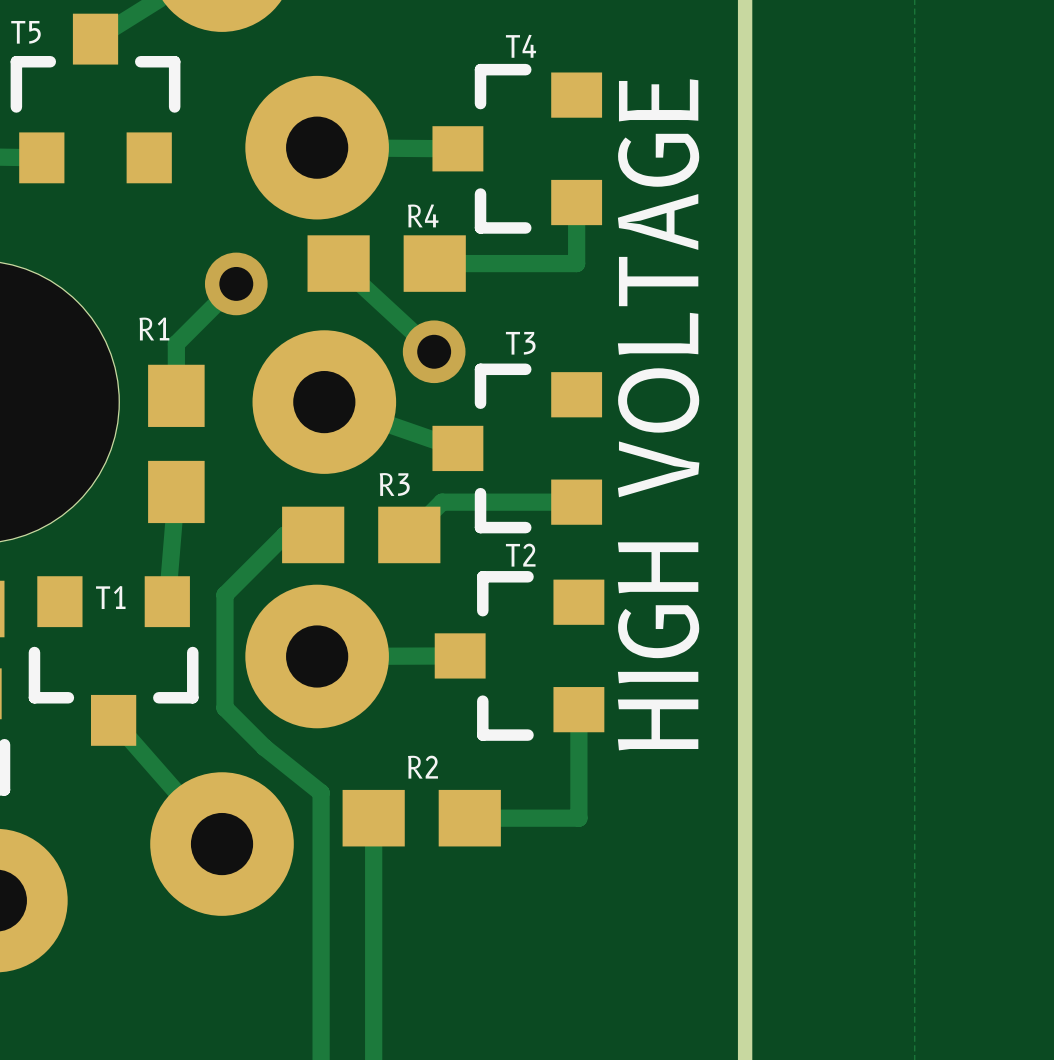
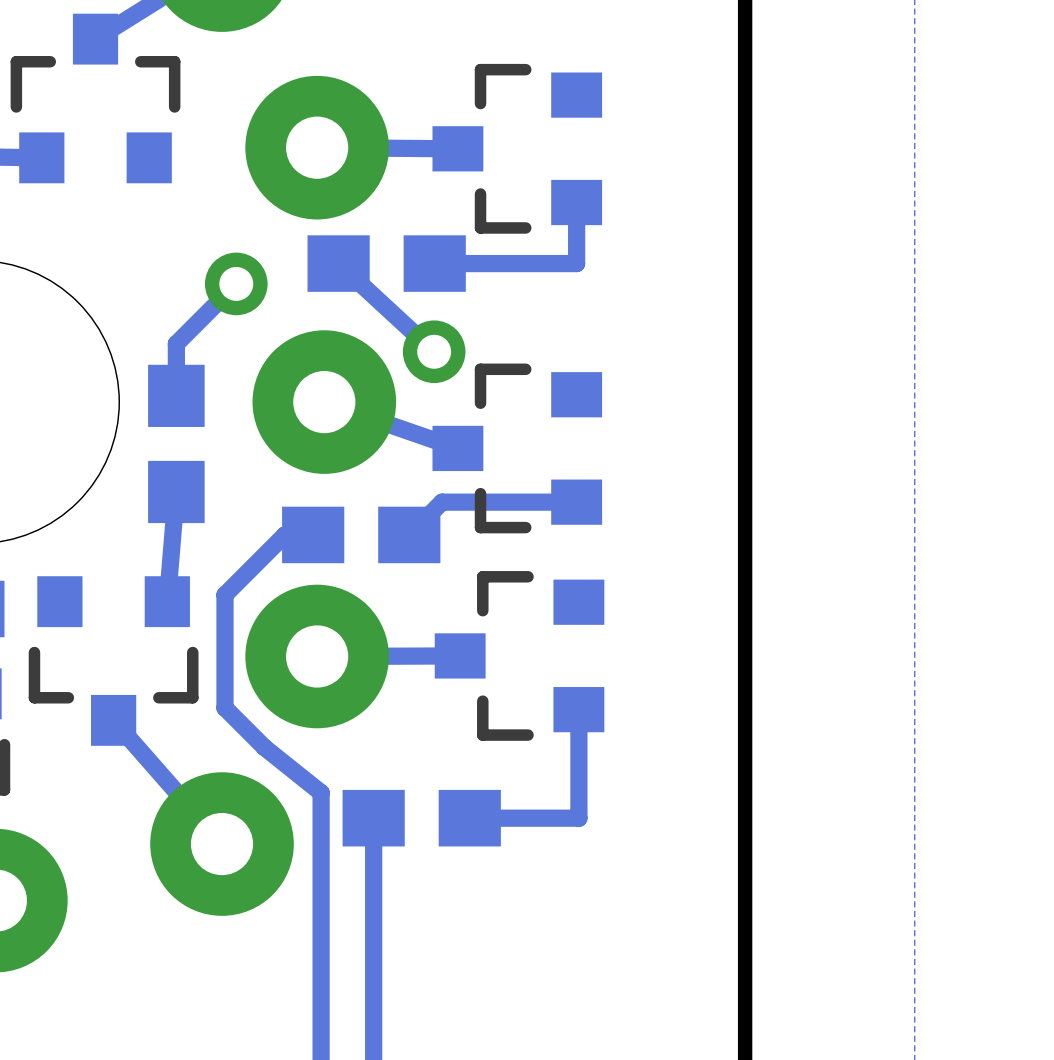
text: T5 (25, 32) -> none
text: T4 (521, 46) -> none
text: R4 (423, 215) -> none
text: R1 (154, 328) -> none
text: T3 (520, 343) -> none
text: HIGH VOLTAGE (658, 414) -> none
text: R3 (394, 484) -> none
text: T2 (520, 555) -> none
text: T1 (110, 597) -> none
text: R2 (422, 767) -> none

